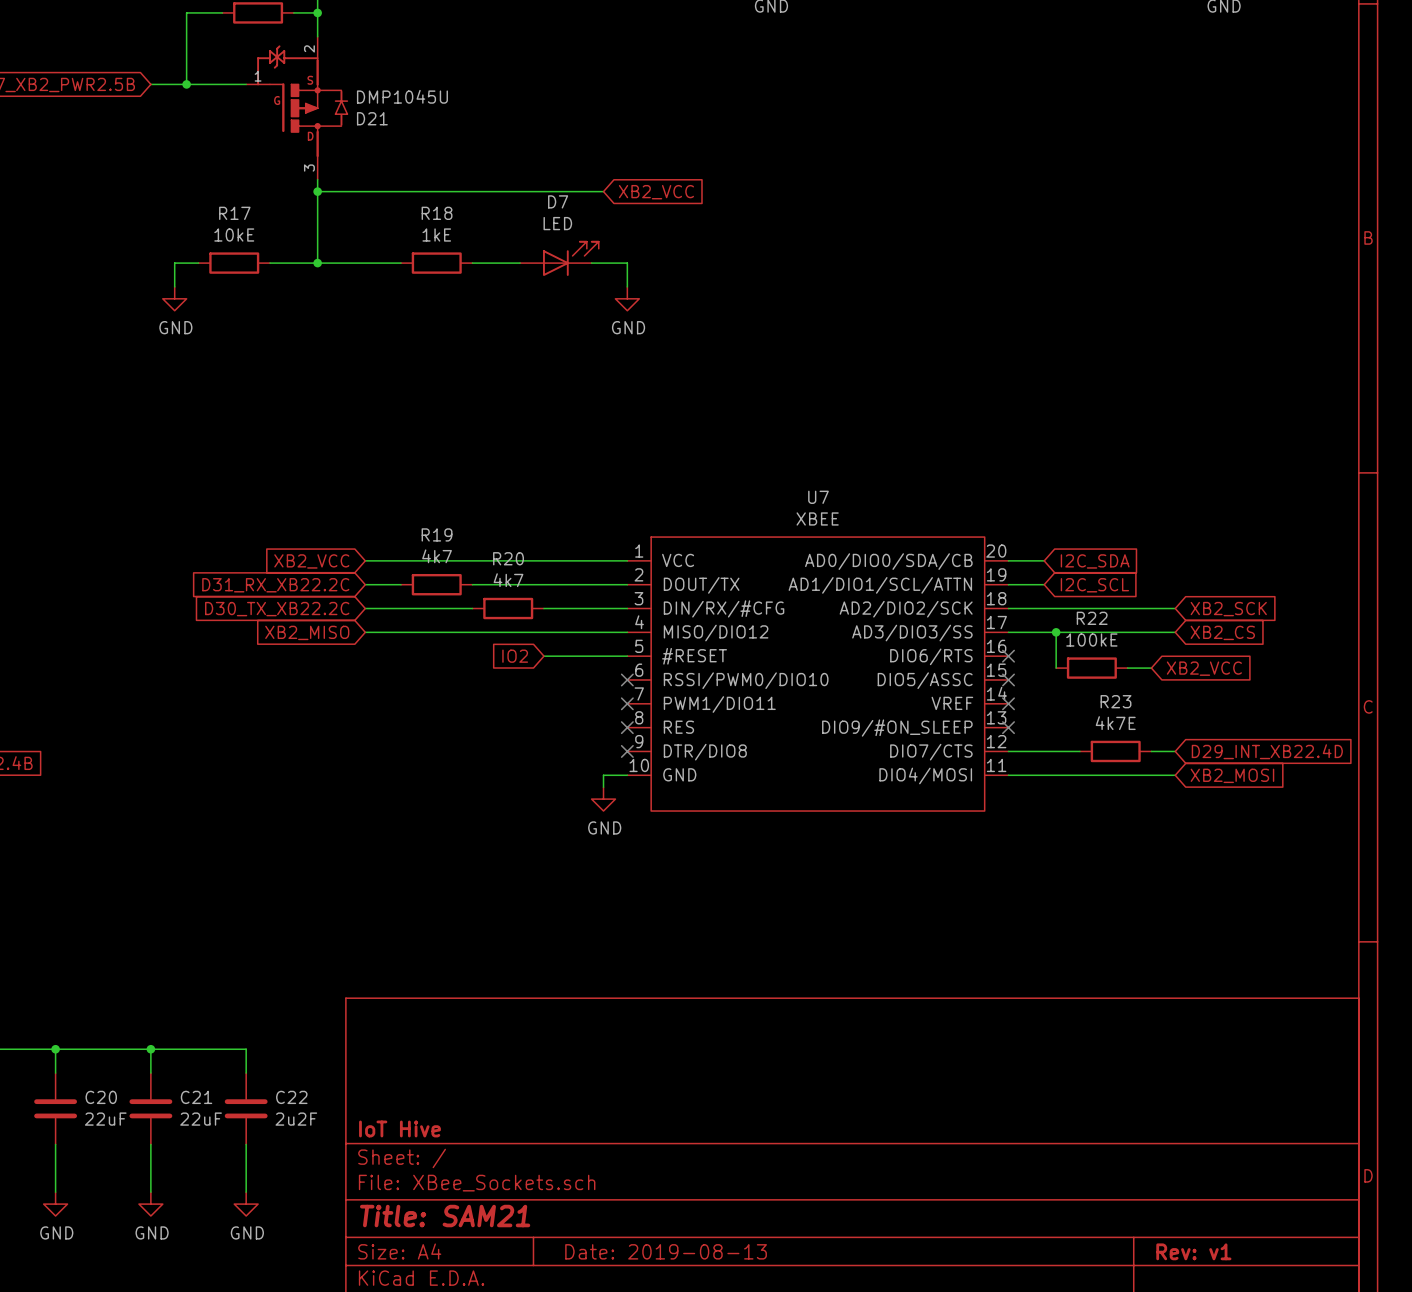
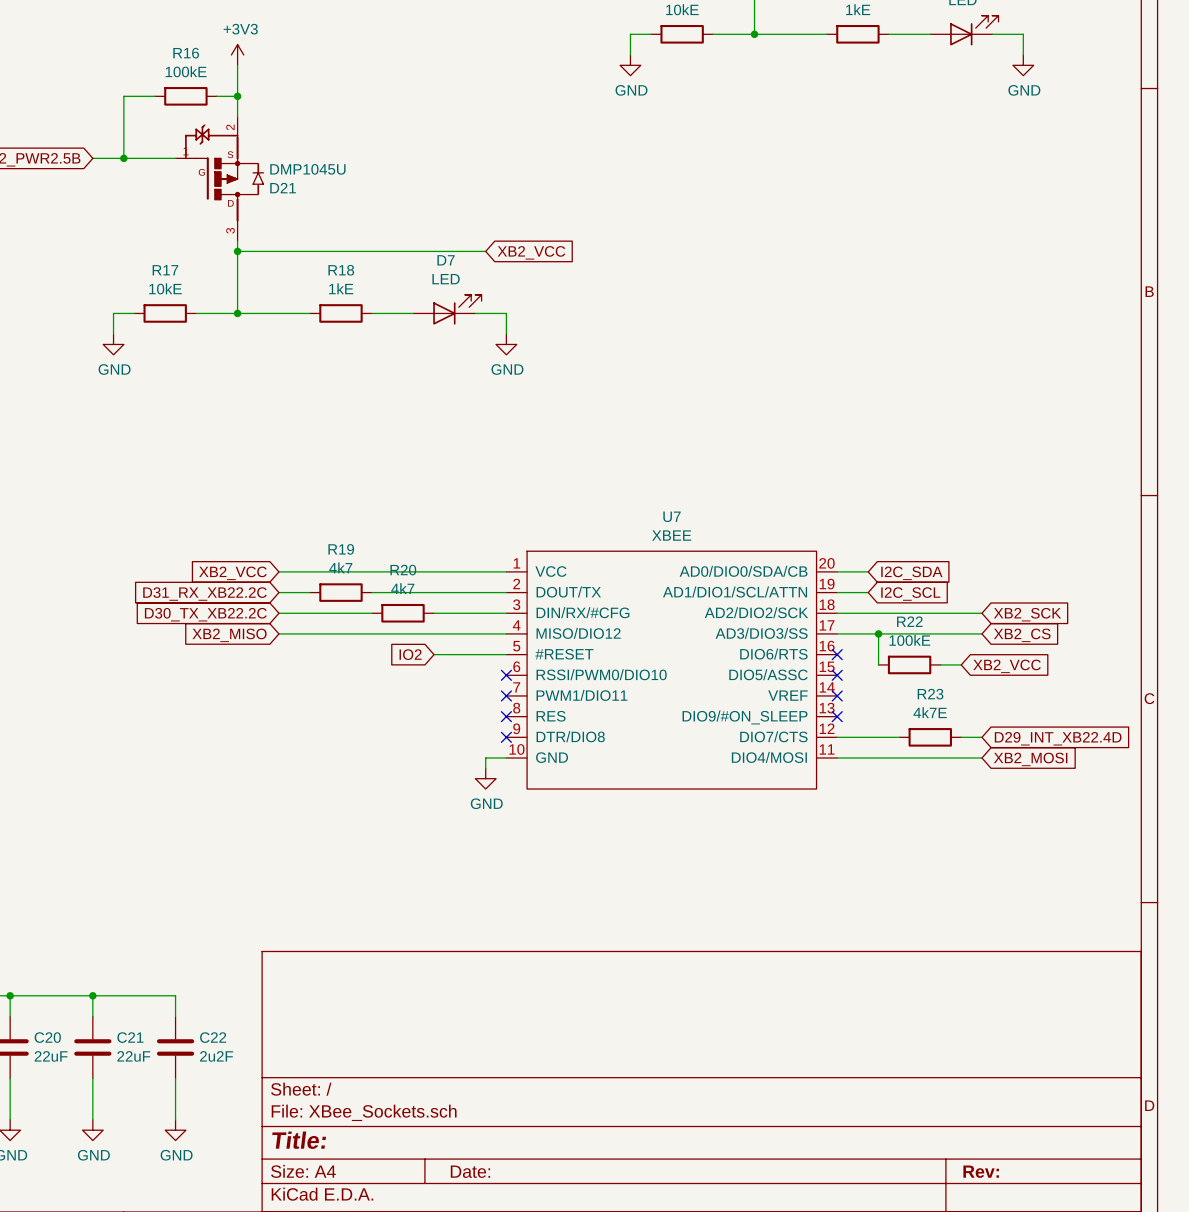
title block: IoT Hive (400, 1128) -> none
title block: Title: SAM21 (445, 1216) -> Title: (299, 1140)
title block: Date: 2019-08-13 (666, 1251) -> Date: (470, 1171)
title block: Rev: v1 (1193, 1251) -> Rev: (981, 1171)

